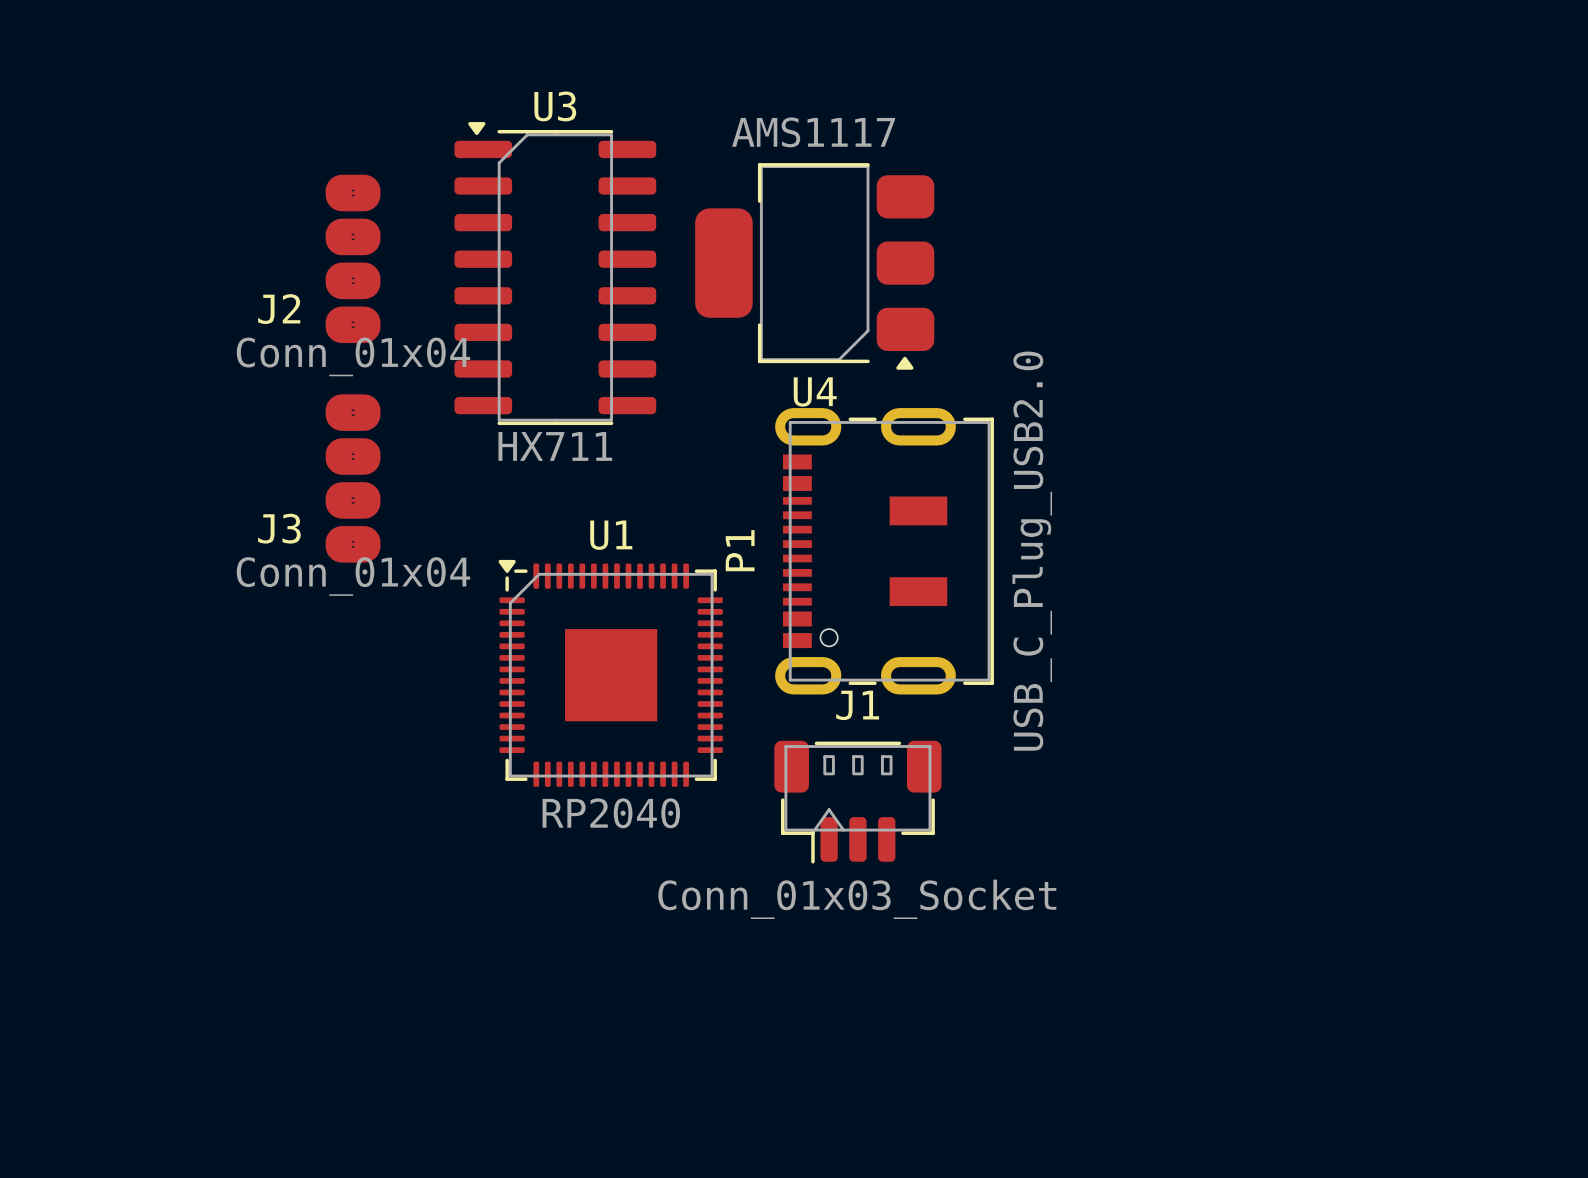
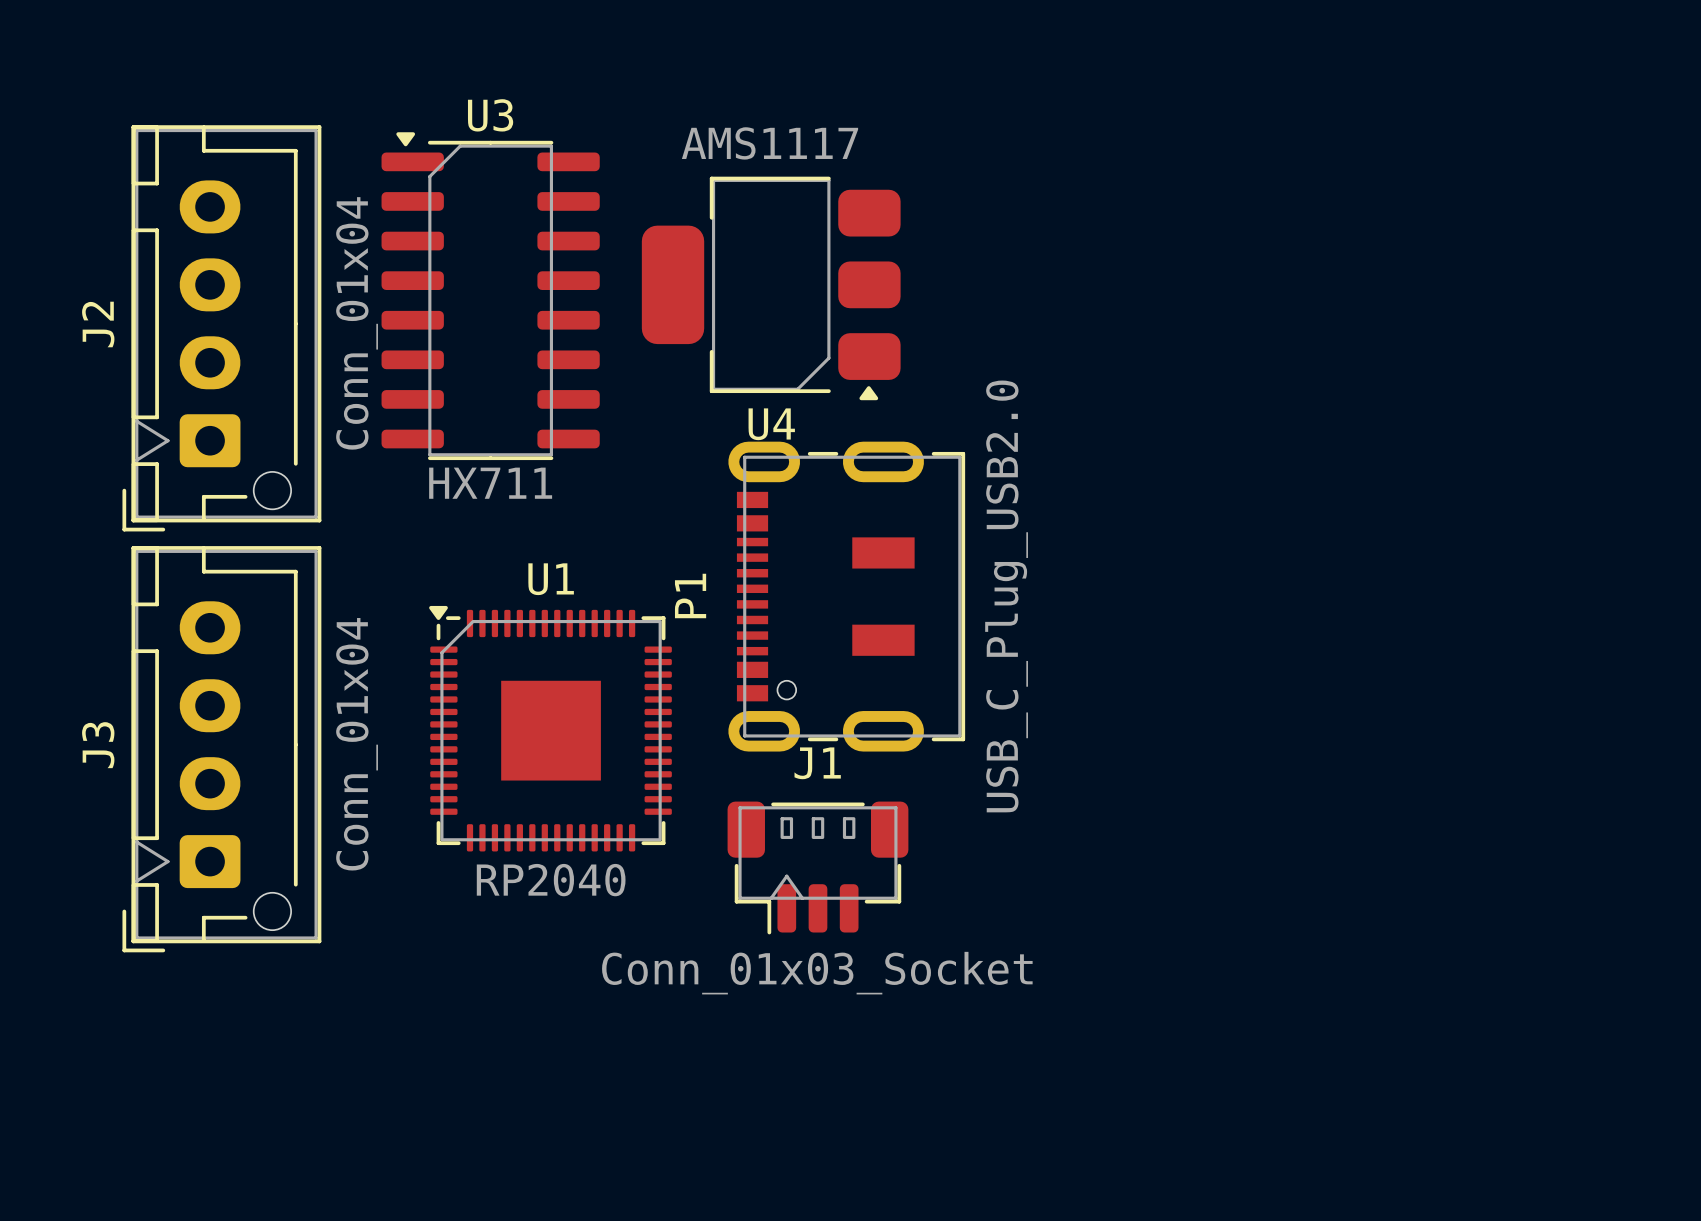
J2 footprint: [325, 174, 381, 344] -> [122, 125, 322, 532]
J2 name position: J2 (279, 309) -> J2 (98, 324)
J2 value position: Conn_01x04 (353, 356) -> Conn_01x04 (357, 323)
J3 footprint: [325, 394, 381, 563] -> [122, 546, 322, 953]
J3 name position: J3 (279, 528) -> J3 (98, 745)
J3 value position: Conn_01x04 (353, 576) -> Conn_01x04 (357, 744)

